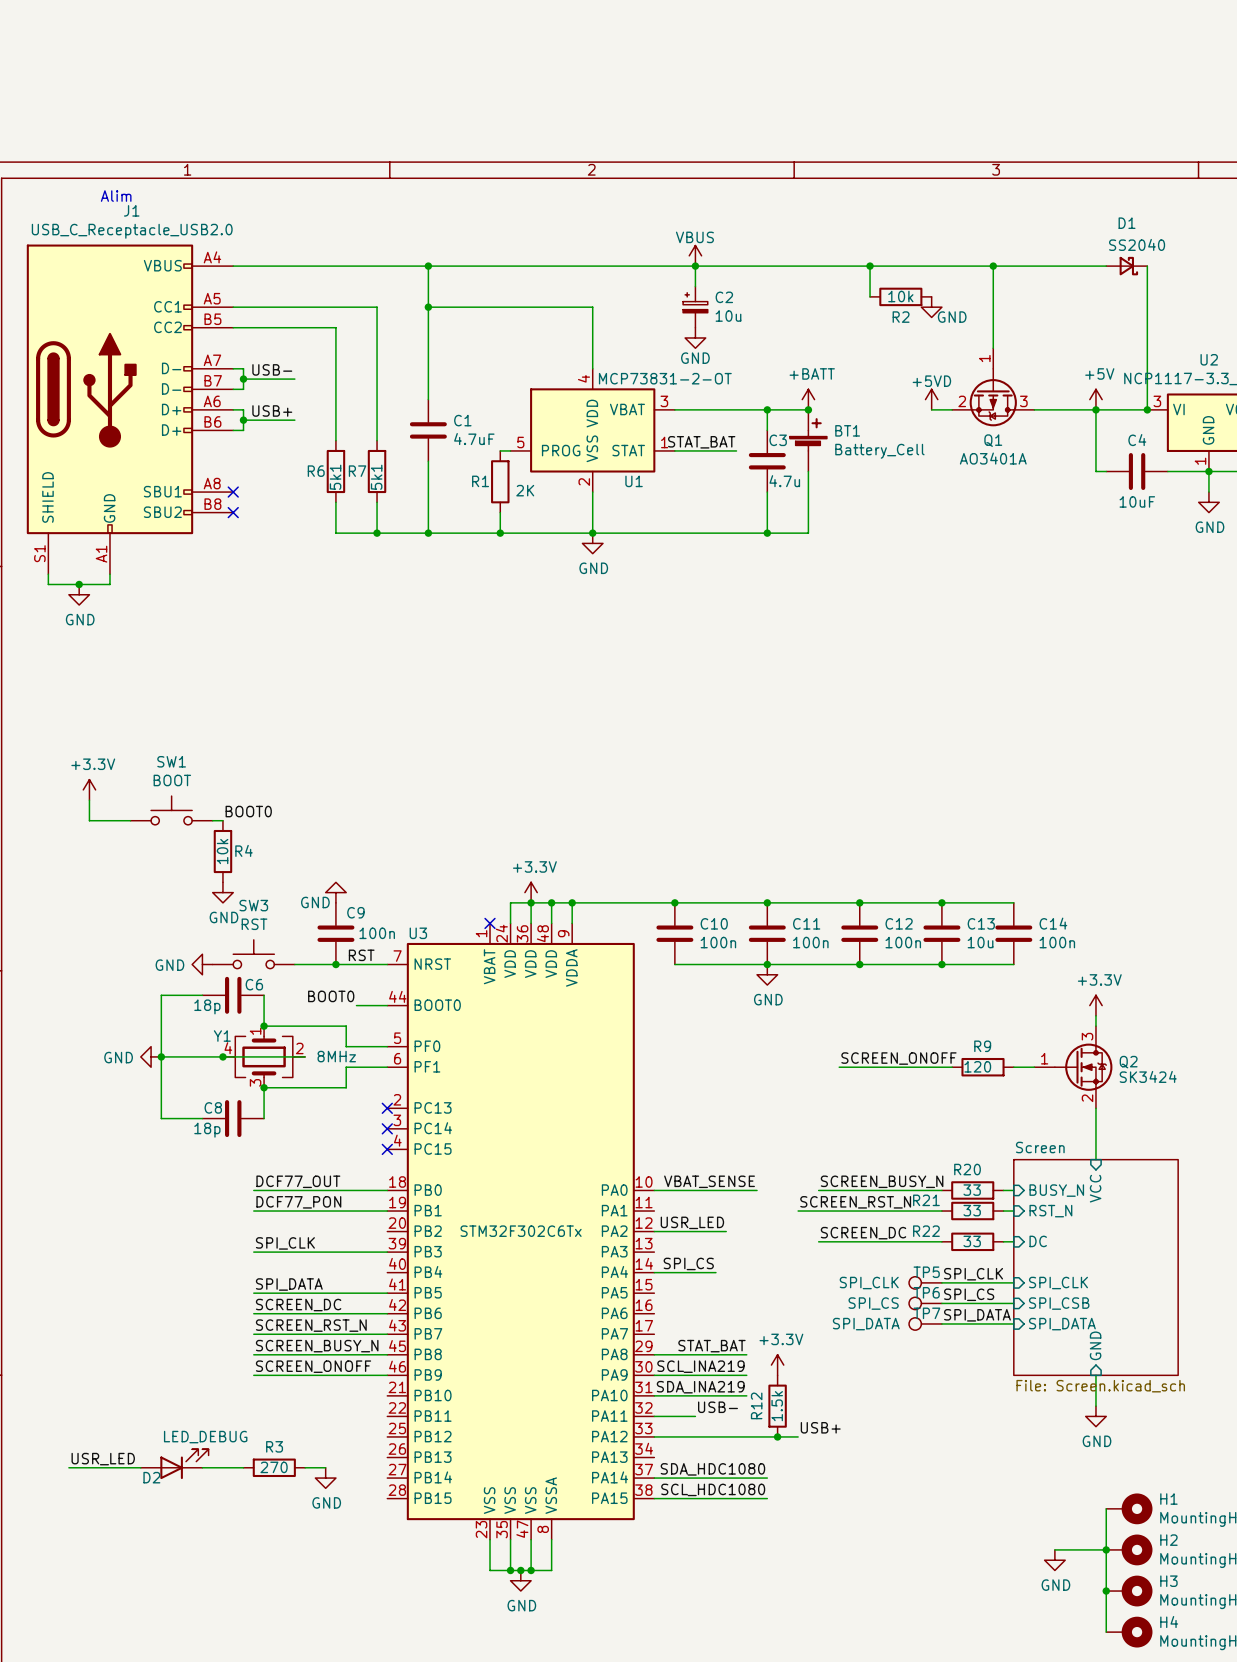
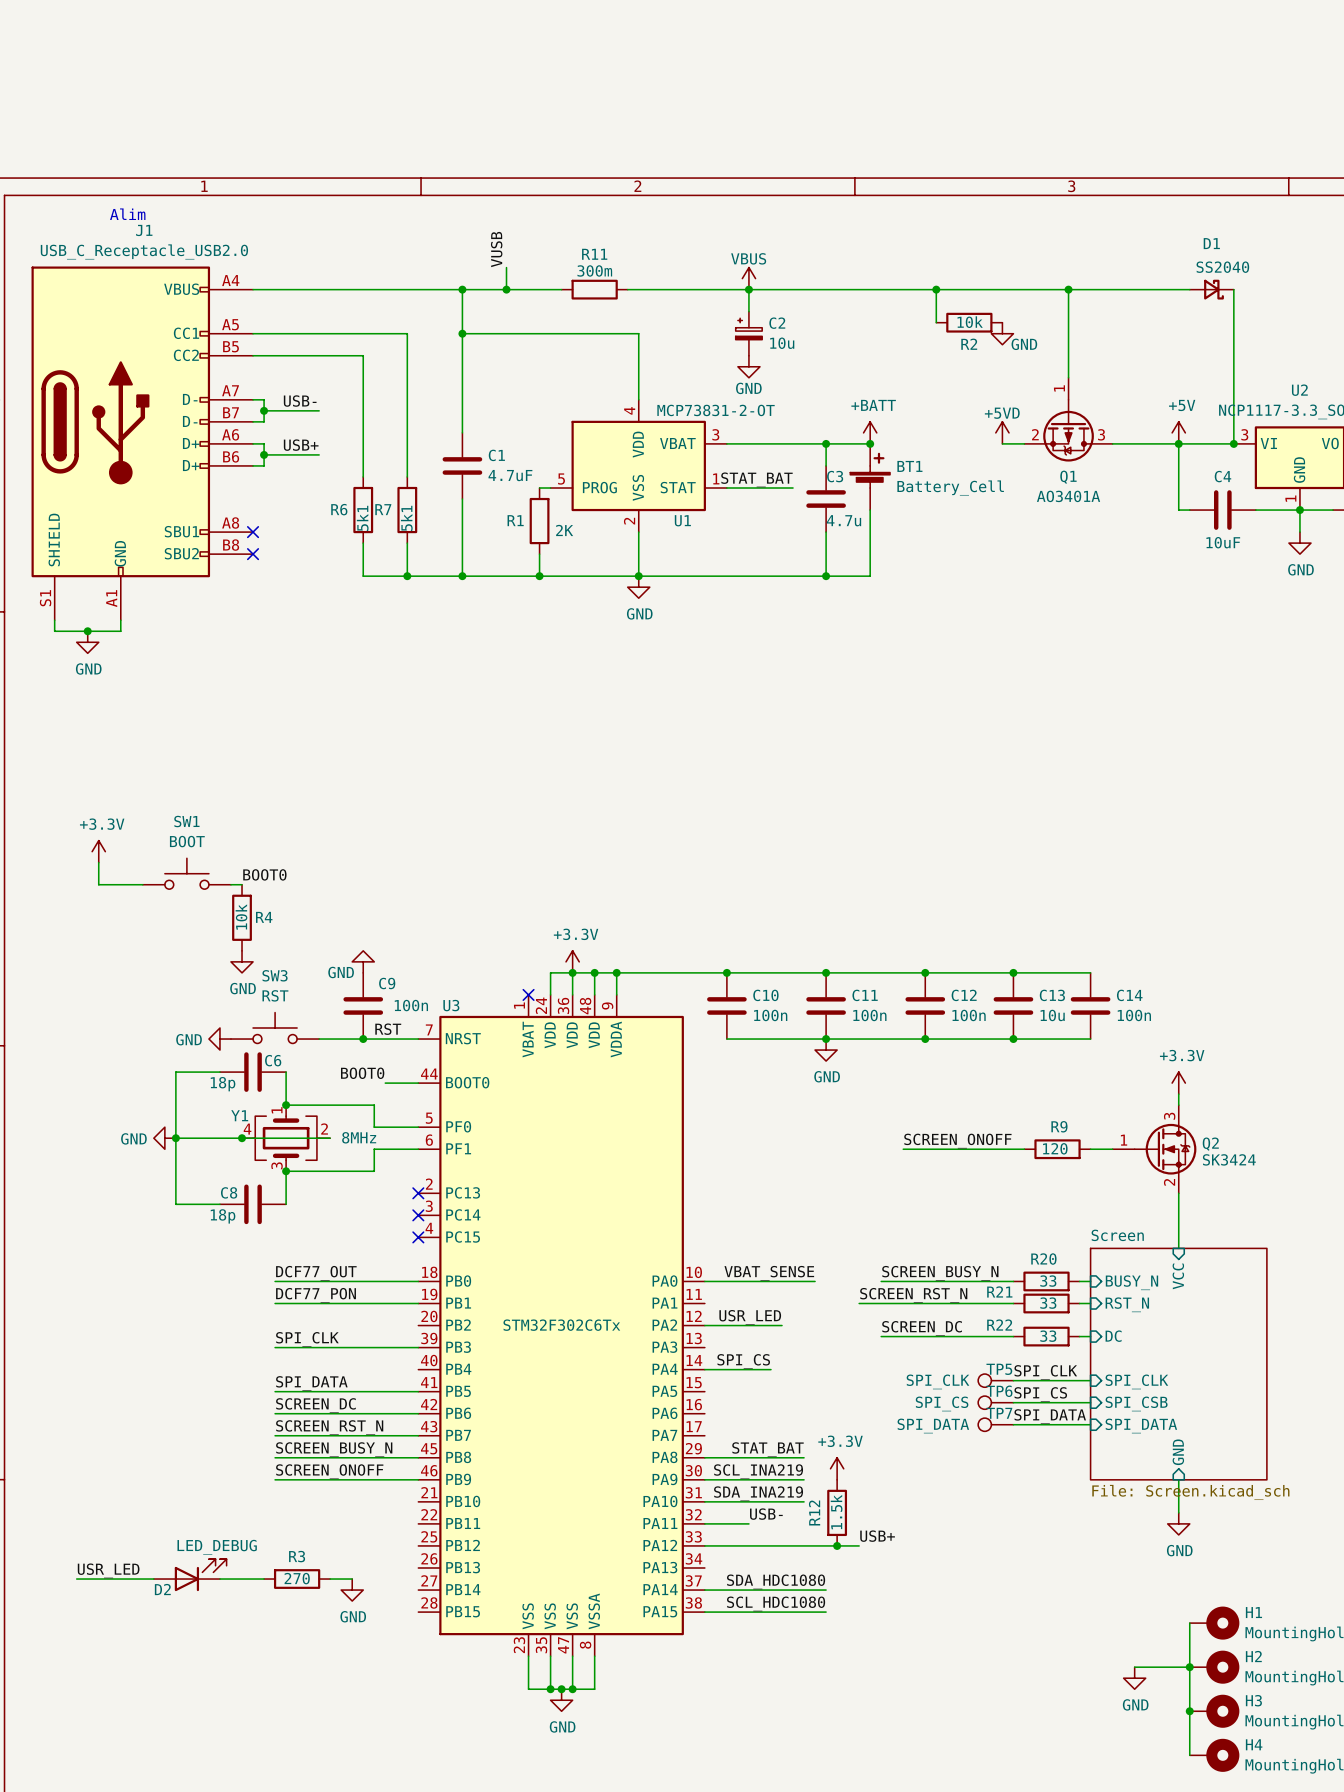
label: none -> VUSB (496, 249)
wire: none -> (506, 267) (506, 289)
junction: none -> (506, 289)
wire: (520, 266) (582, 266) -> none
R11: none -> 300m (594, 289)

